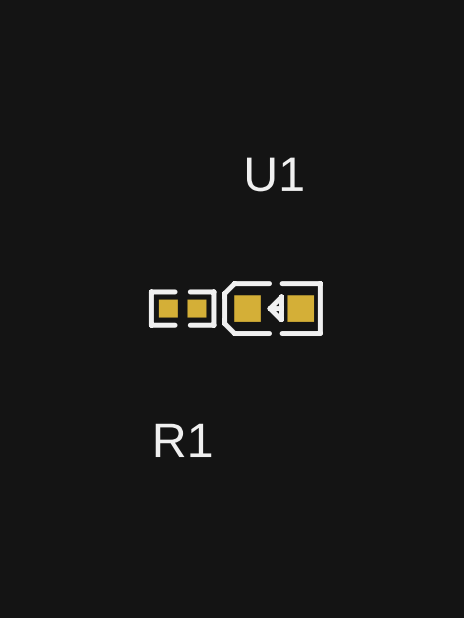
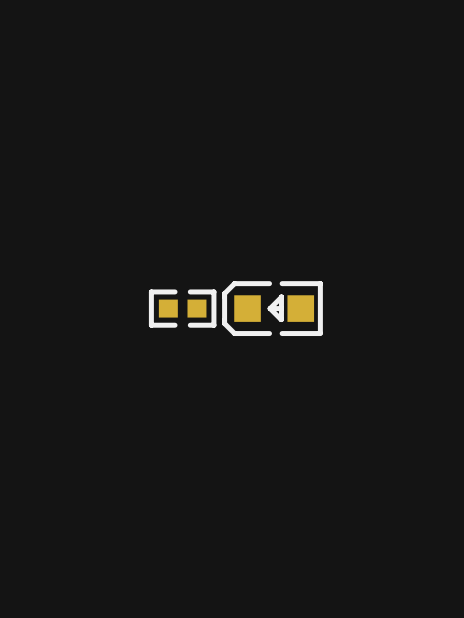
U1 name: U1 (274, 174) -> none
R1 name: R1 (183, 440) -> none

